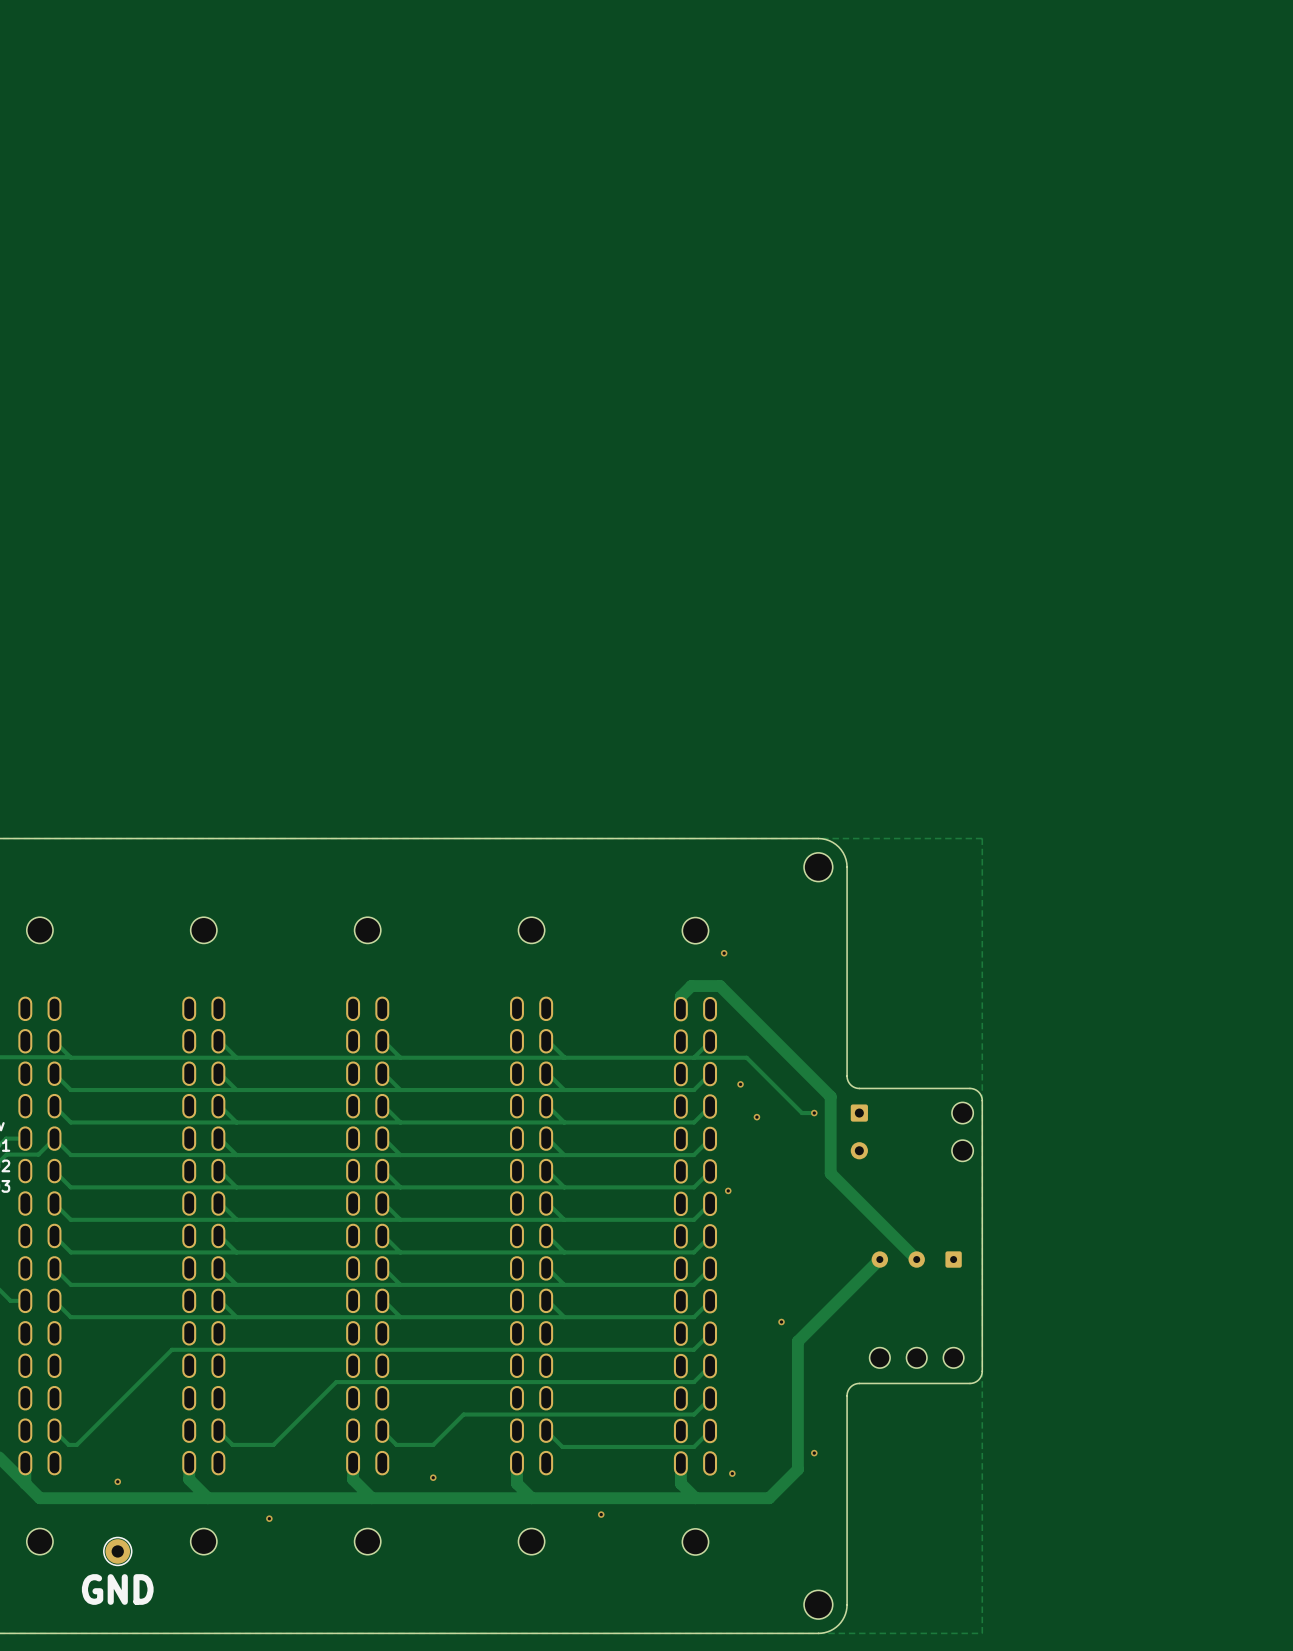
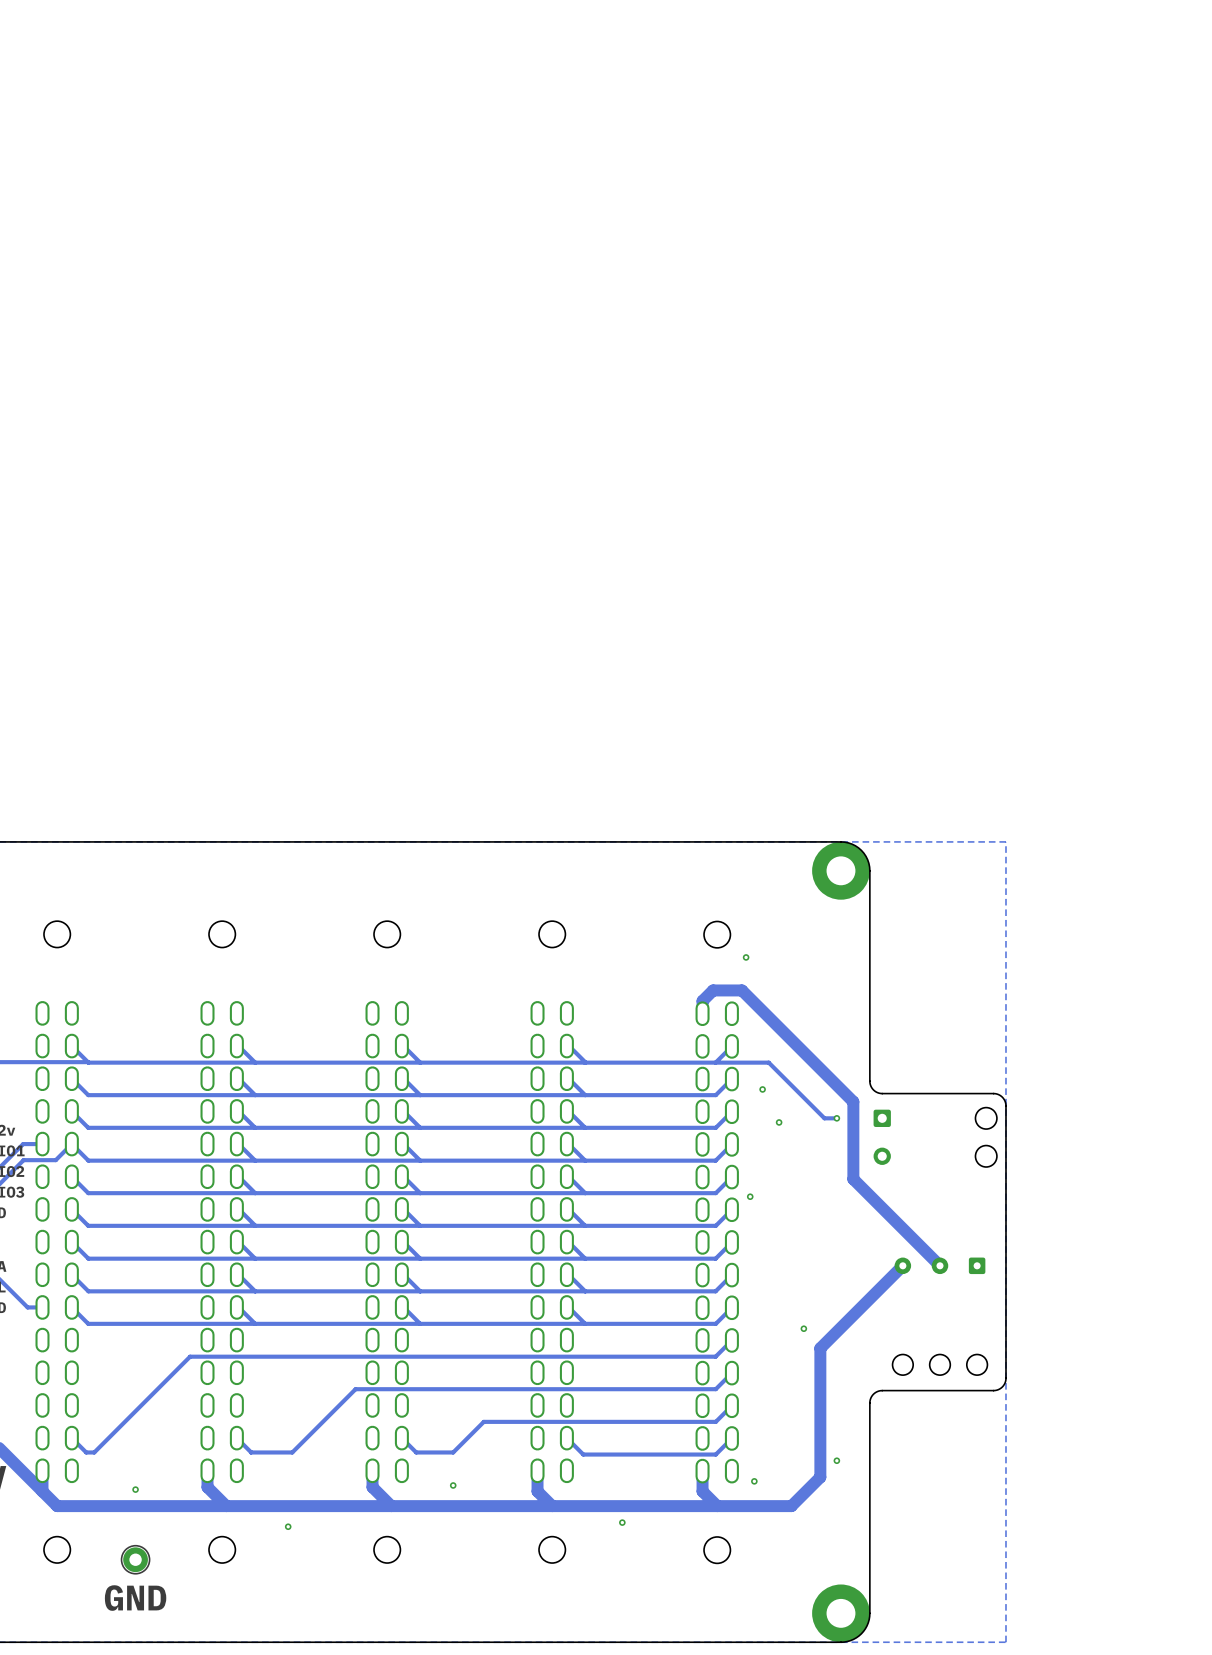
part footprint: [804, 852, 833, 882] -> [812, 841, 870, 900]
part footprint: [804, 1590, 833, 1620] -> [812, 1584, 870, 1643]

